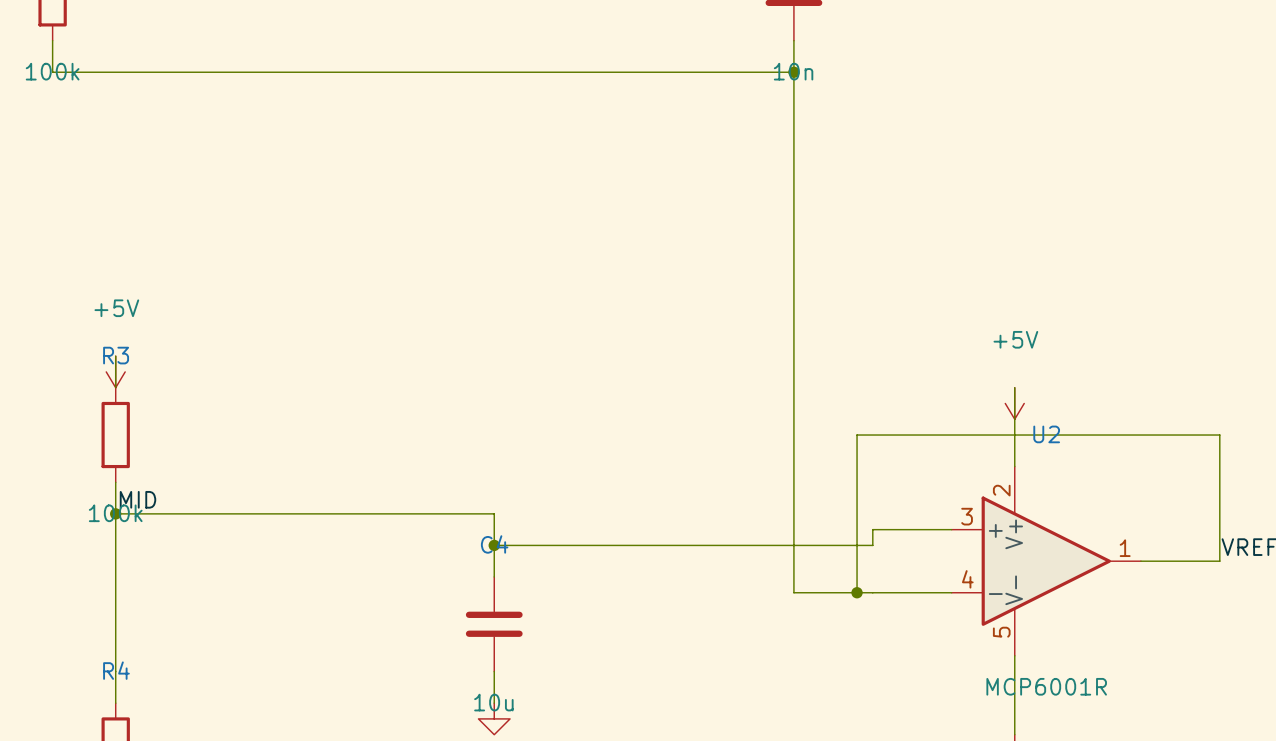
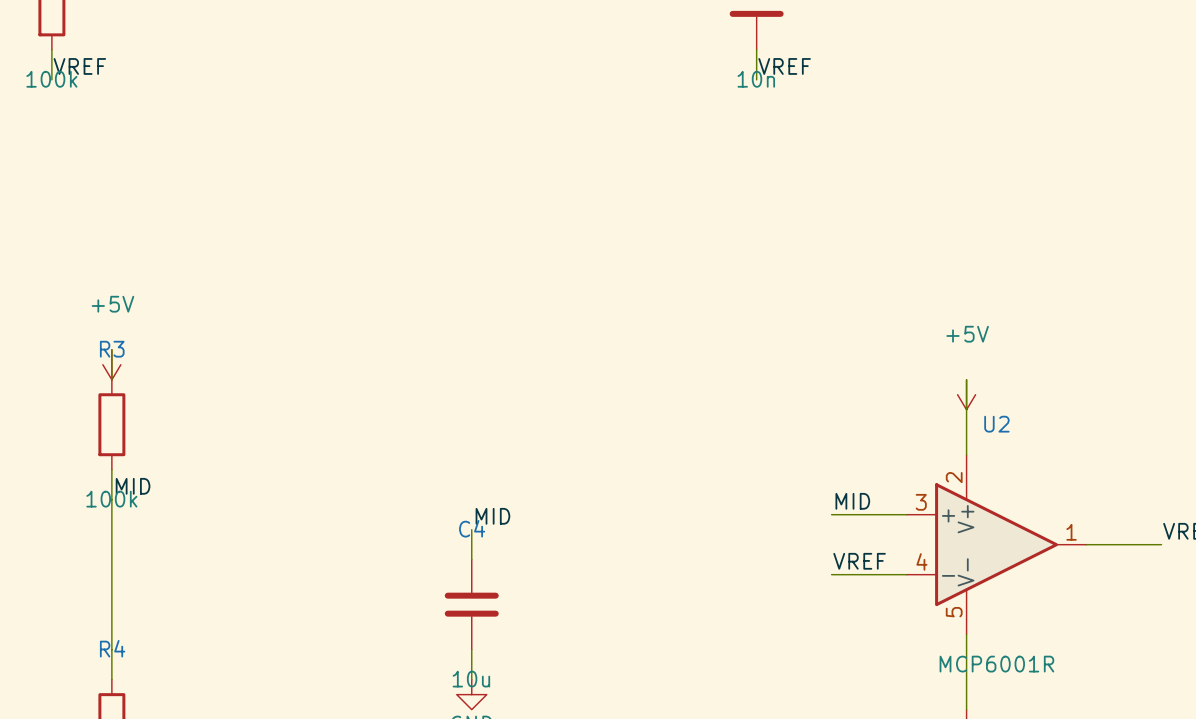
label: none -> VREF (79, 66)
label: none -> VREF (784, 66)
wire: (52, 72) (793, 72) (793, 592) (872, 592) -> none
junction: (793, 72) -> none
wire: (115, 513) (494, 513) (494, 545) (872, 545) (872, 529) -> none
junction: (115, 513) -> none
label: none -> MID (852, 501)
label: none -> MID (492, 516)
junction: (494, 545) -> none
wire: (1219, 561) (1219, 435) (857, 435) (857, 592) -> none
label: none -> VREF (859, 561)
junction: (857, 592) -> none

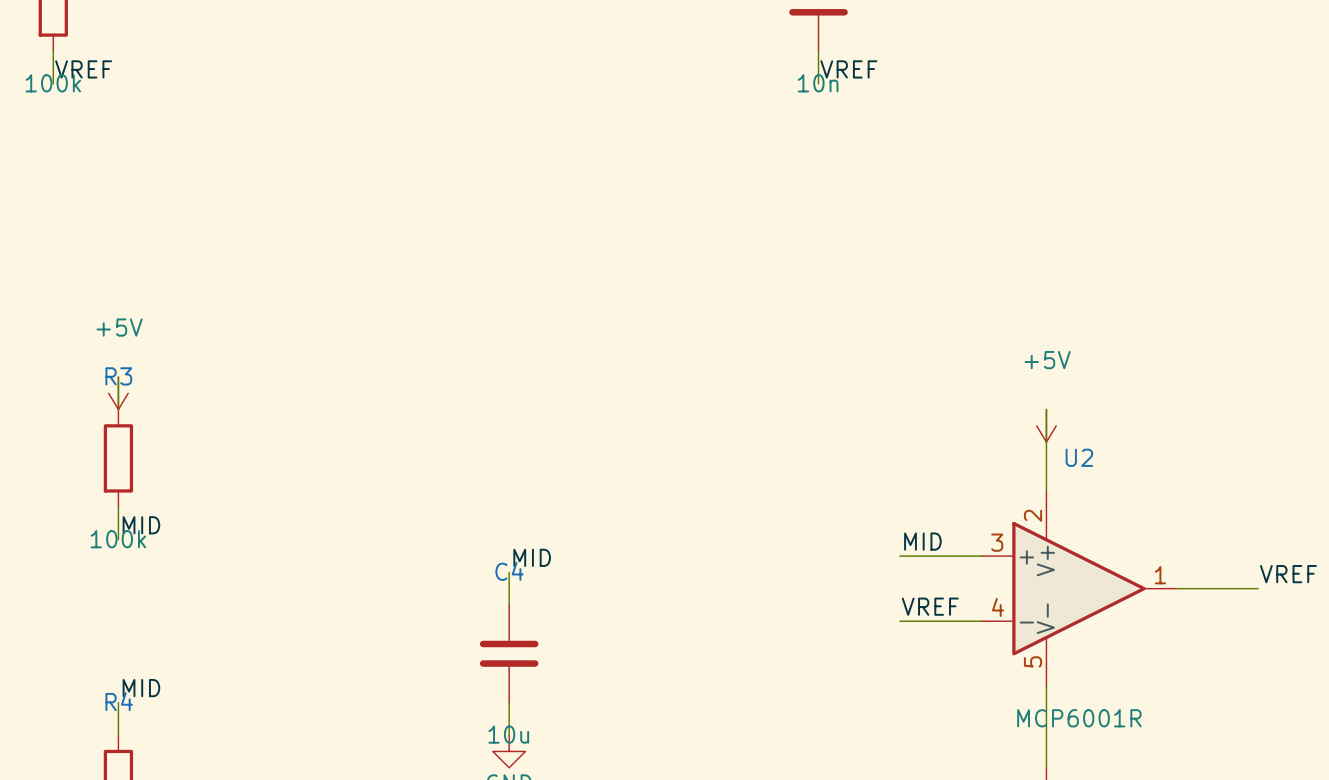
wire: (111, 499) (111, 649) -> none
label: none -> MID (141, 688)

